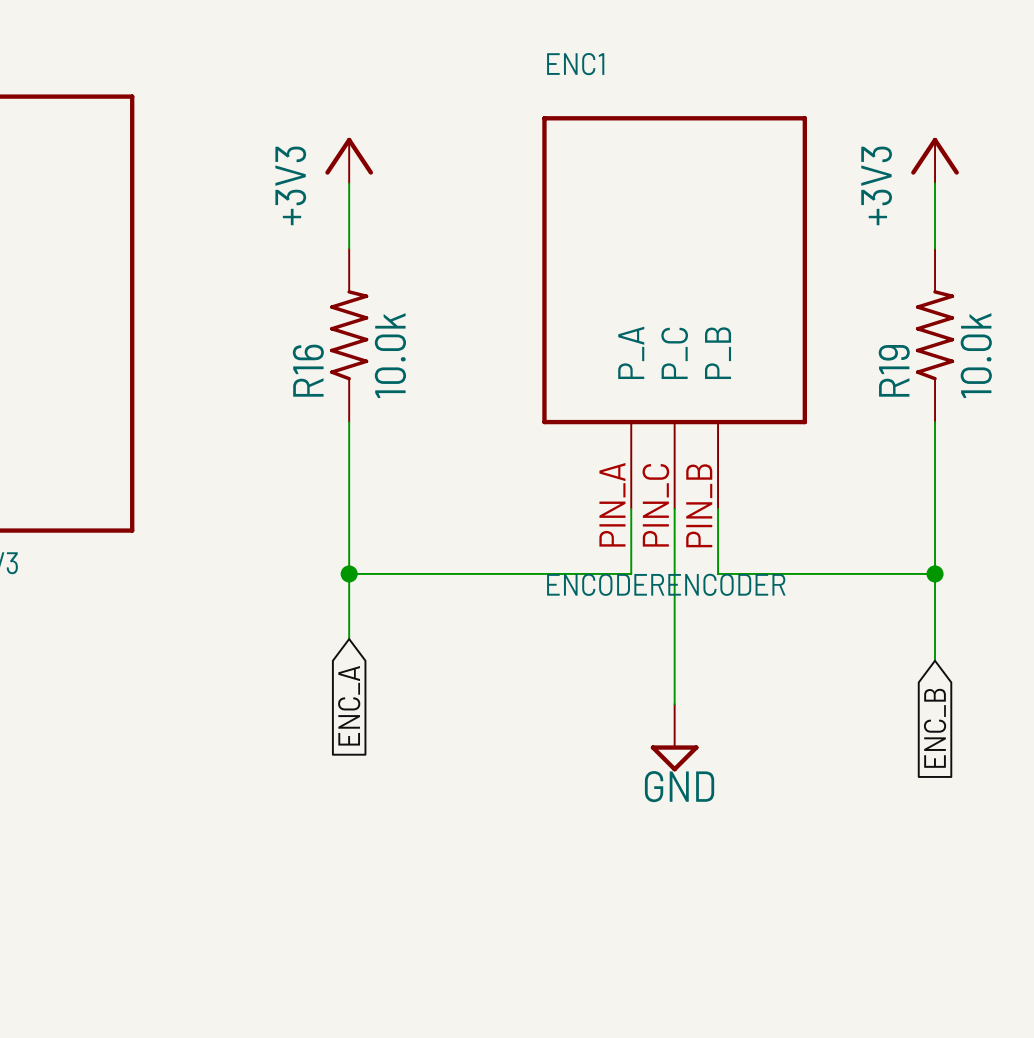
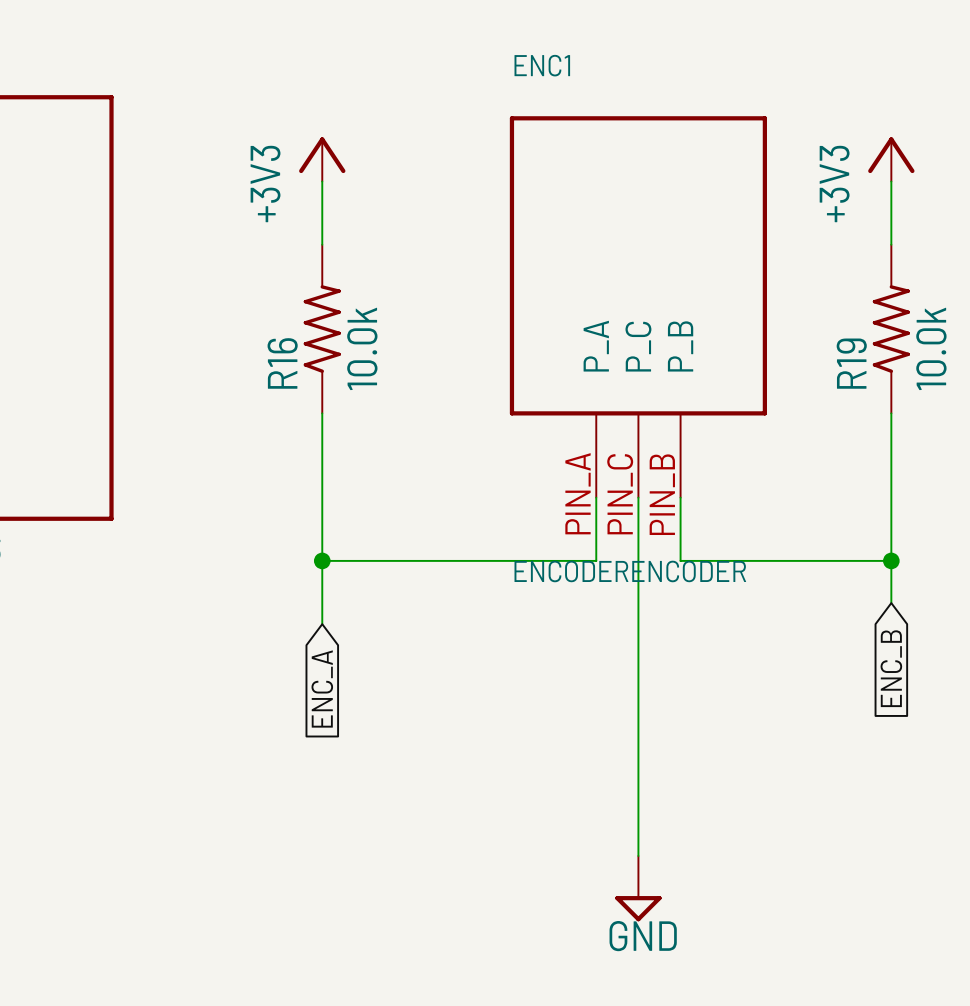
wire: (935, 617) (935, 660) -> none
wire: none -> (638, 687) (638, 855)
global label position: ENC_B (935, 728) -> ENC_B (891, 668)
power symbol position: GND (674, 737) -> GND (638, 888)

